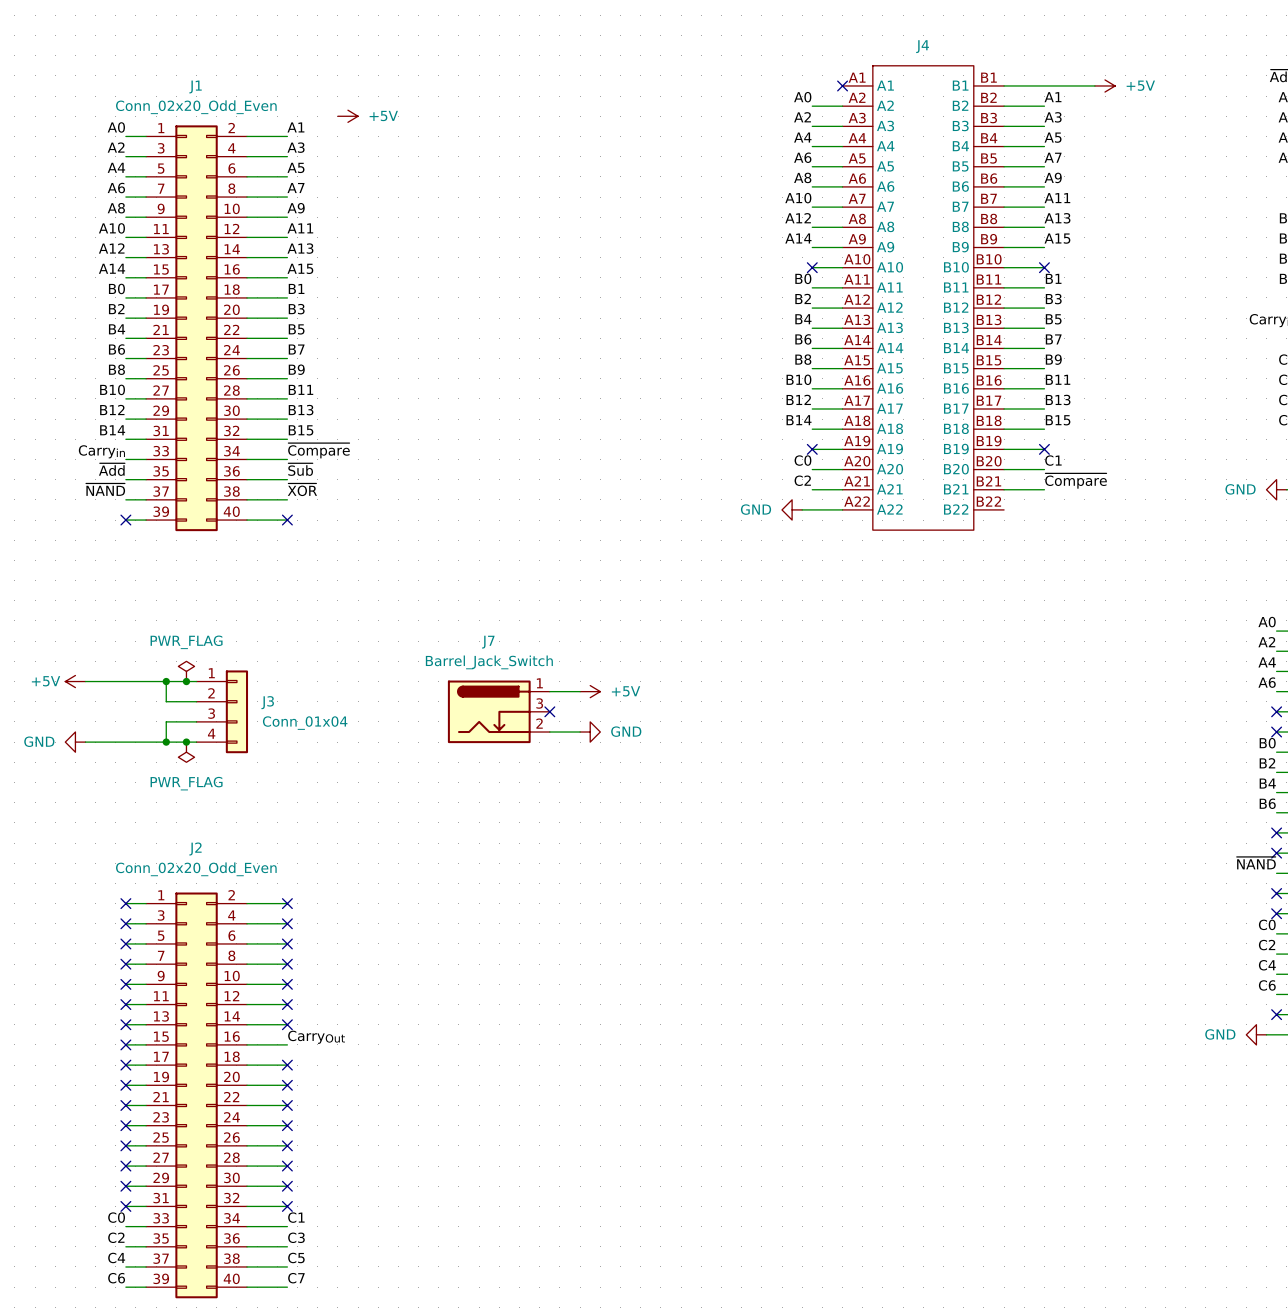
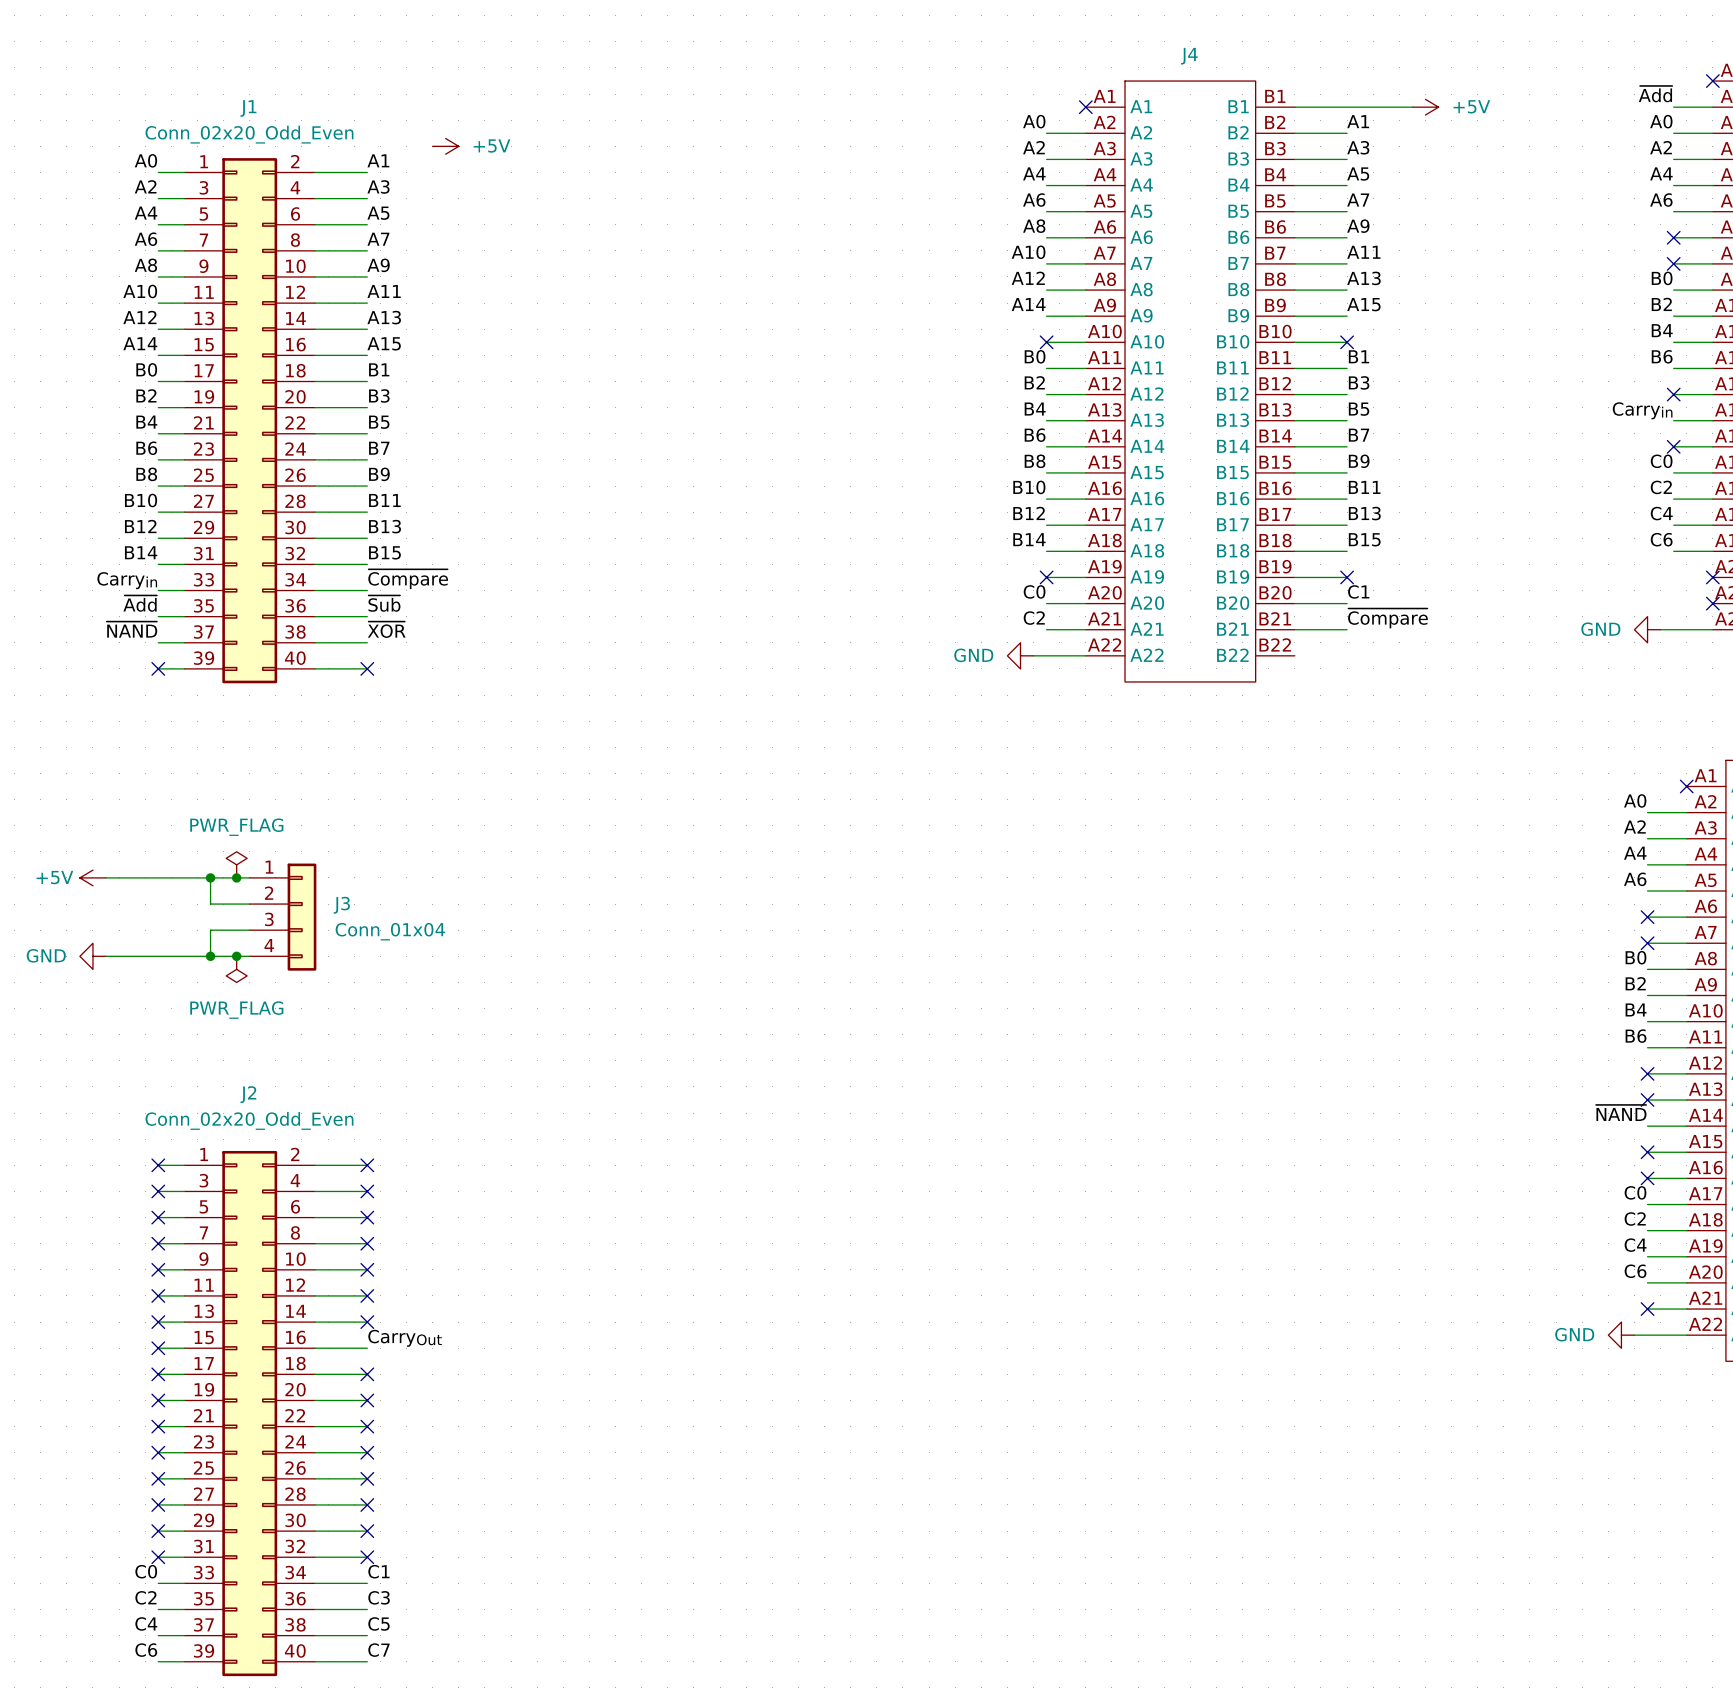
wire: (549, 691) (580, 691) -> none
power symbol: +5V (590, 691) -> none
J7: Barrel_Jack_Switch (498, 711) -> none
no-connect mark: (549, 711) -> none
wire: (549, 732) (580, 732) -> none
power symbol: GND (590, 732) -> none

